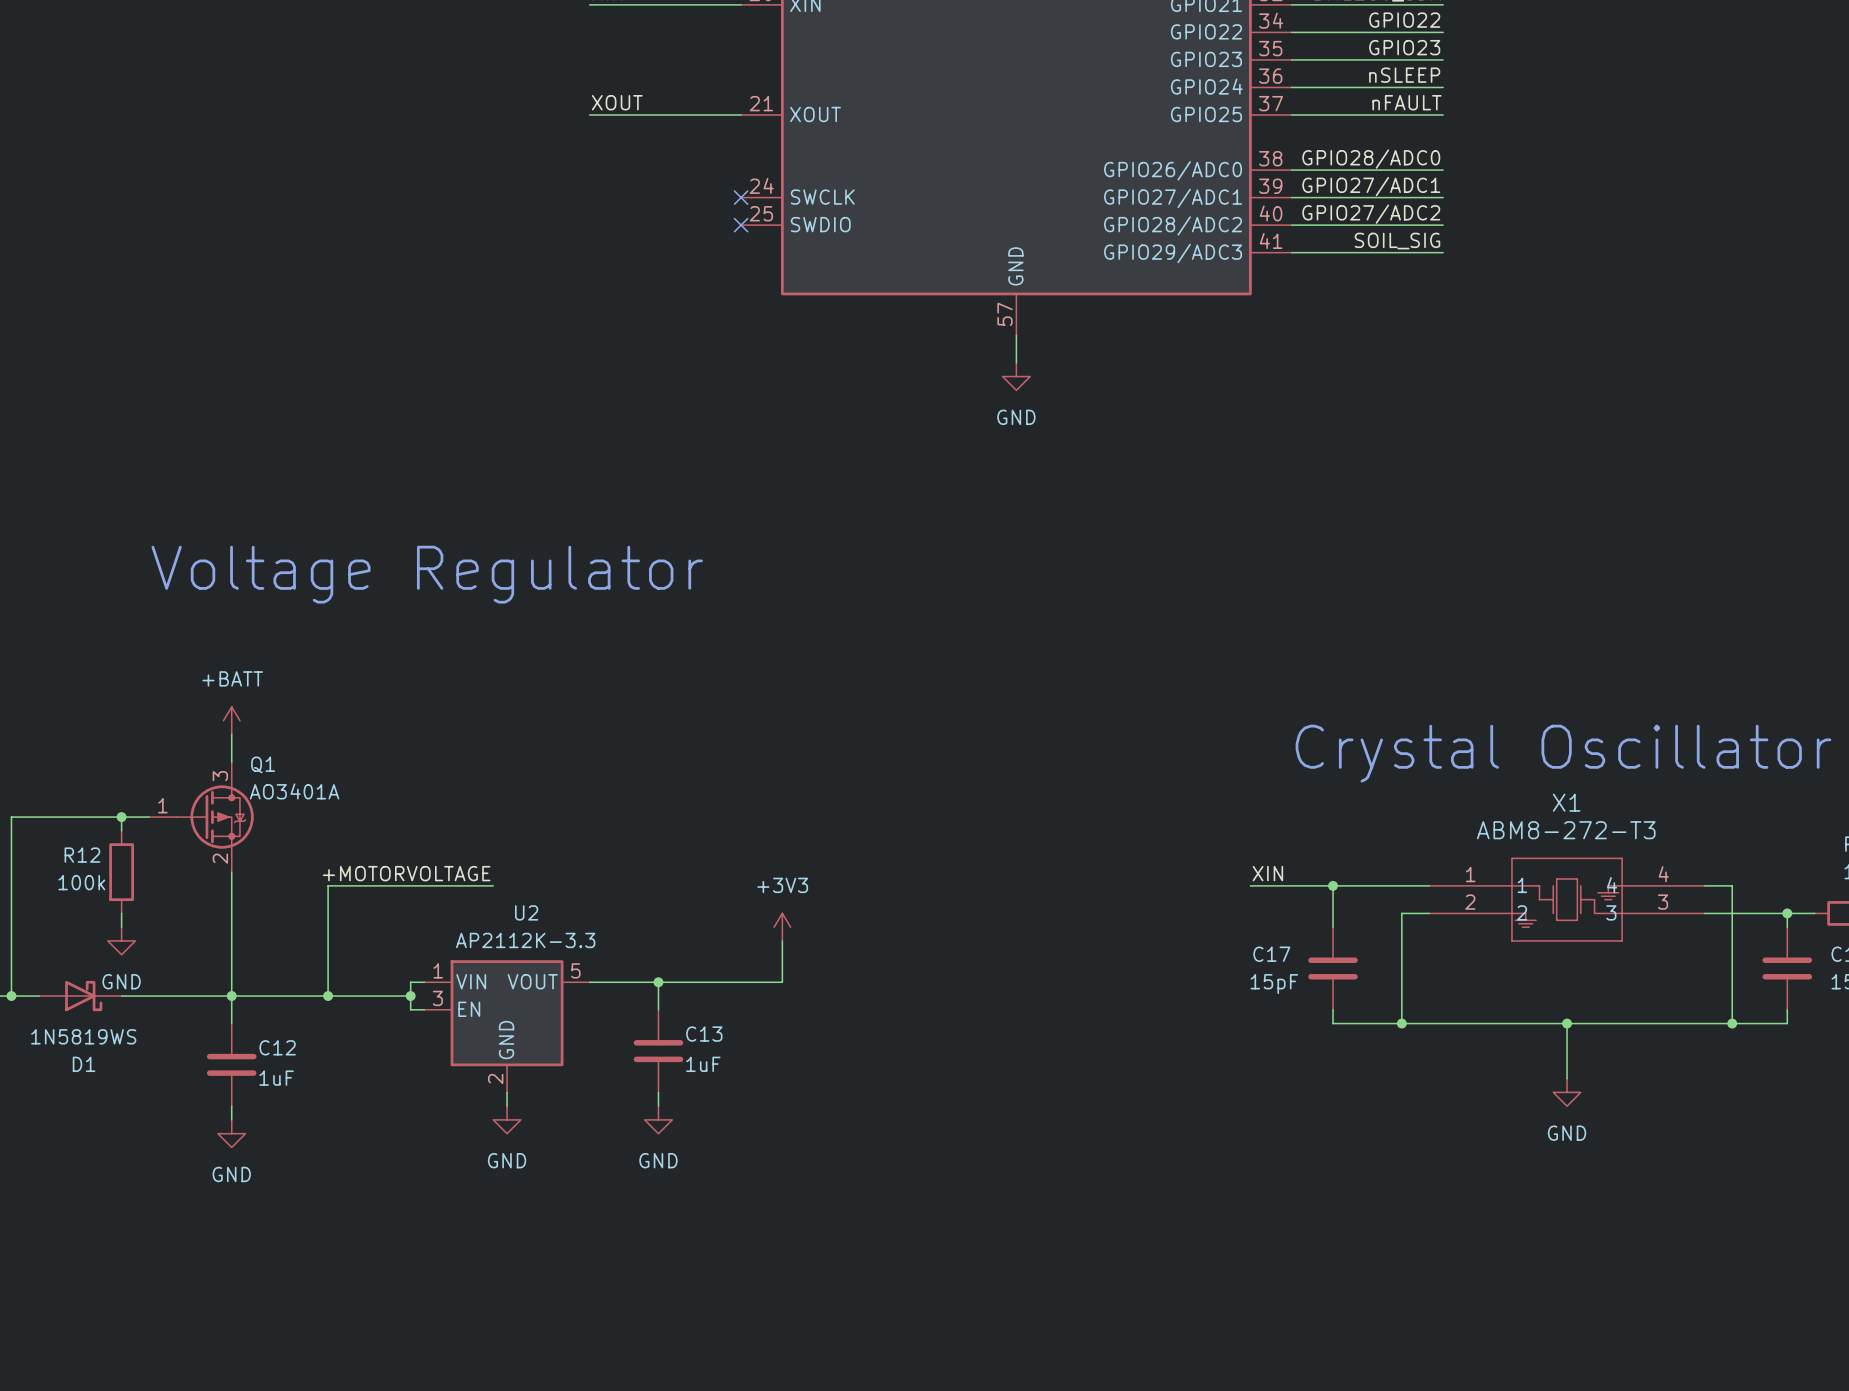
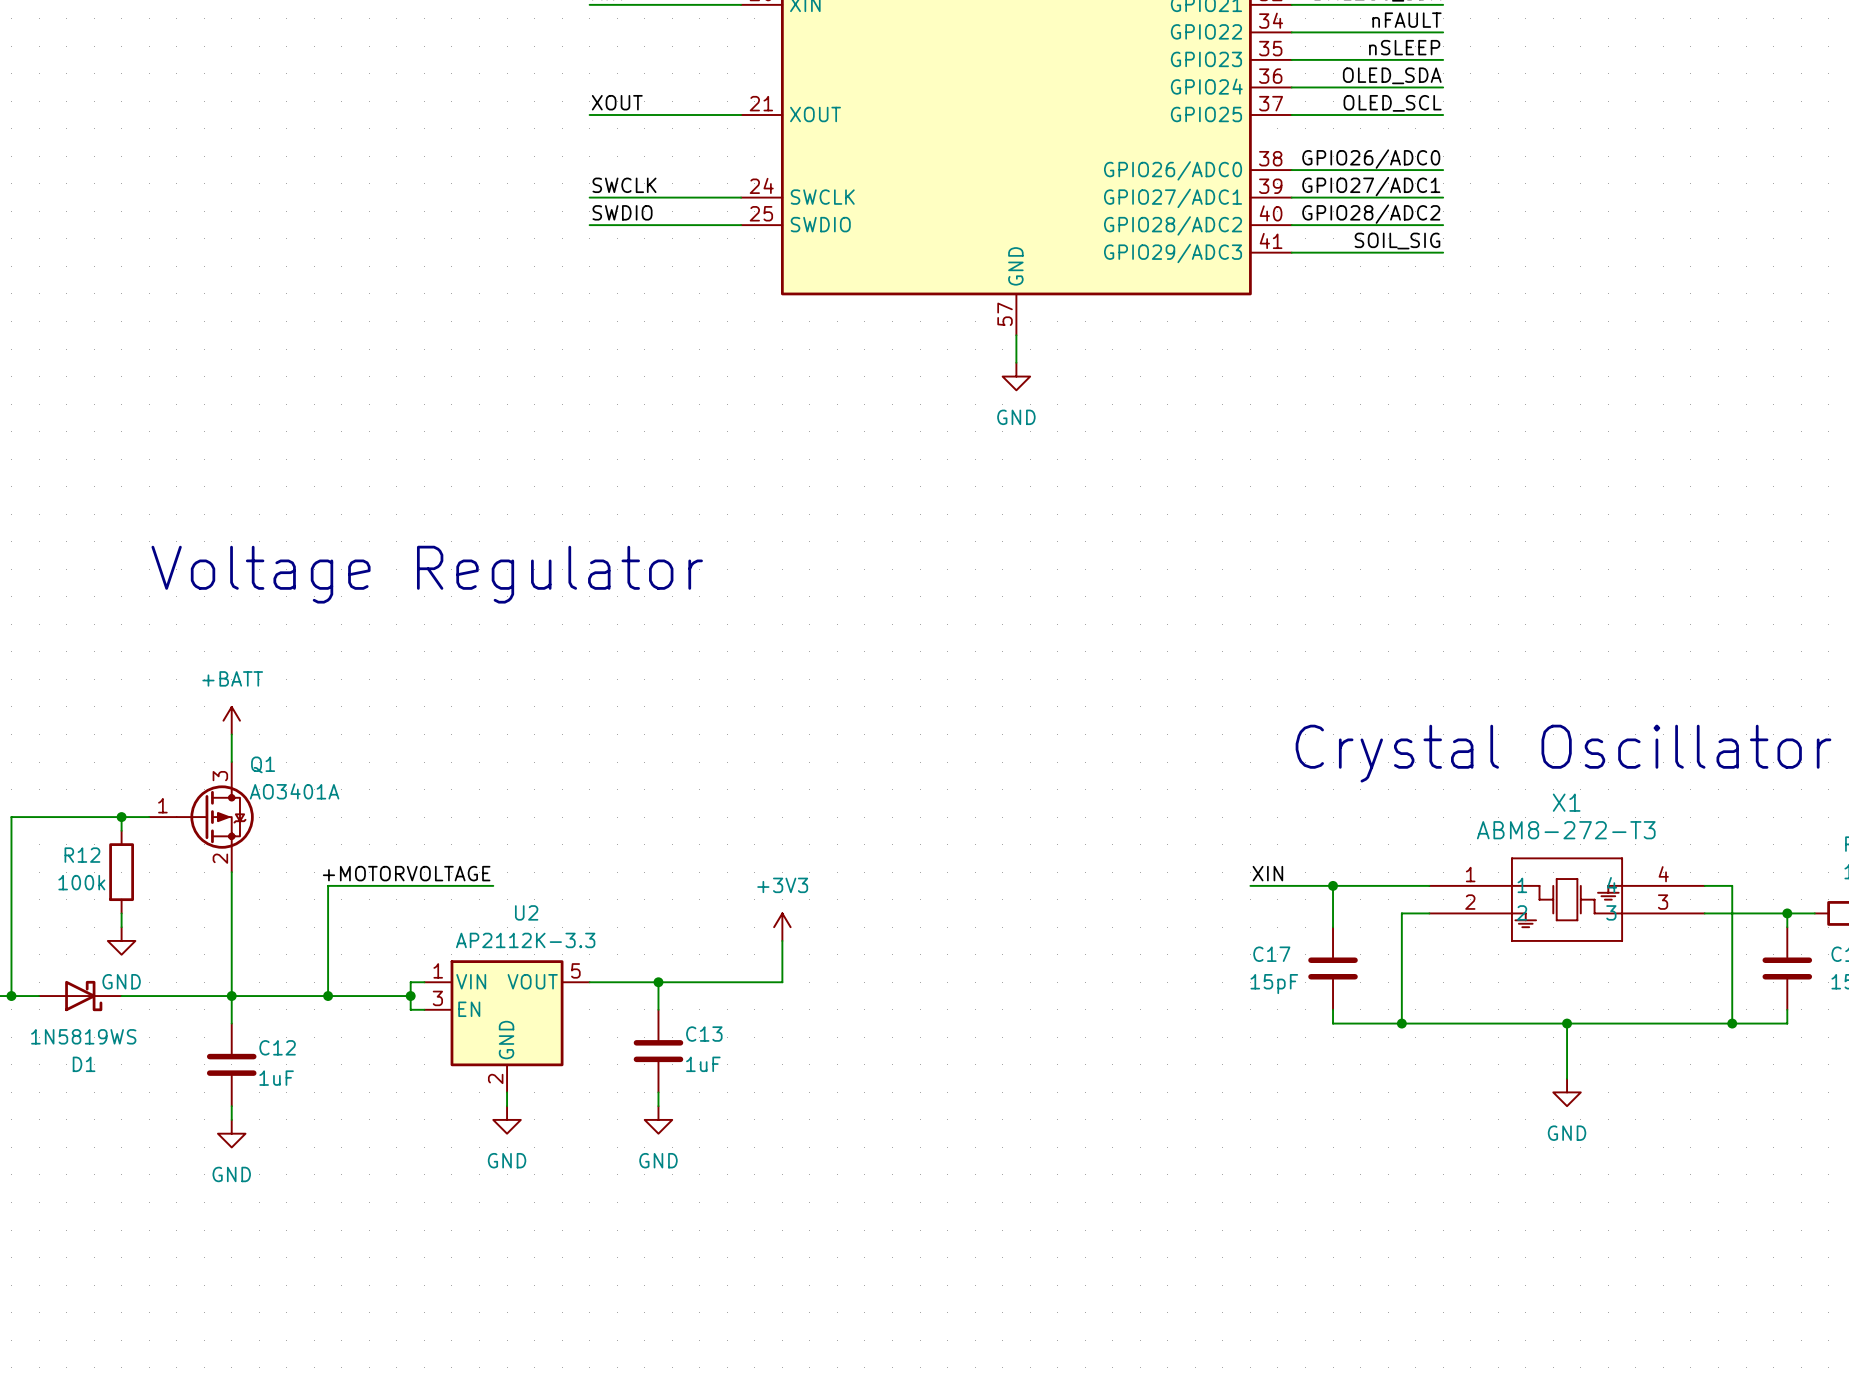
label: GPIO22 (1404, 20) -> nFAULT (1406, 20)
label: GPIO23 (1404, 47) -> nSLEEP (1404, 47)
label: nSLEEP (1404, 75) -> OLED_SDA (1392, 75)
label: nFAULT (1406, 102) -> OLED_SCL (1392, 103)
label: GPIO28/ADC0 (1371, 159) -> GPIO26/ADC0 (1371, 159)
label: none -> SWCLK (624, 185)
wire: none -> (589, 197) (741, 197)
no-connect mark: (741, 197) -> none
label: none -> SWDIO (622, 212)
label: GPIO27/ADC2 (1371, 214) -> GPIO28/ADC2 (1371, 214)
wire: none -> (589, 225) (741, 225)
no-connect mark: (741, 225) -> none

